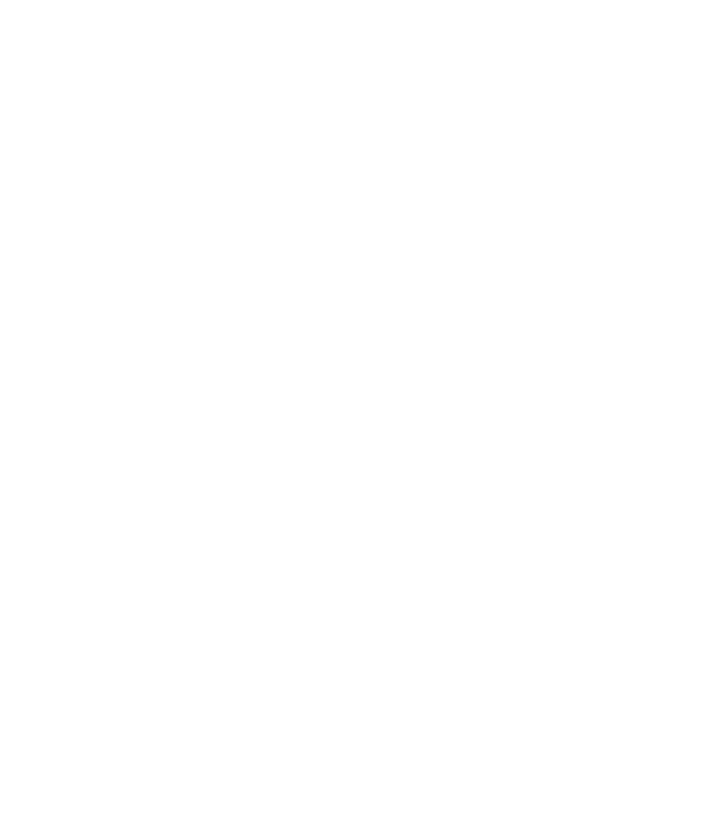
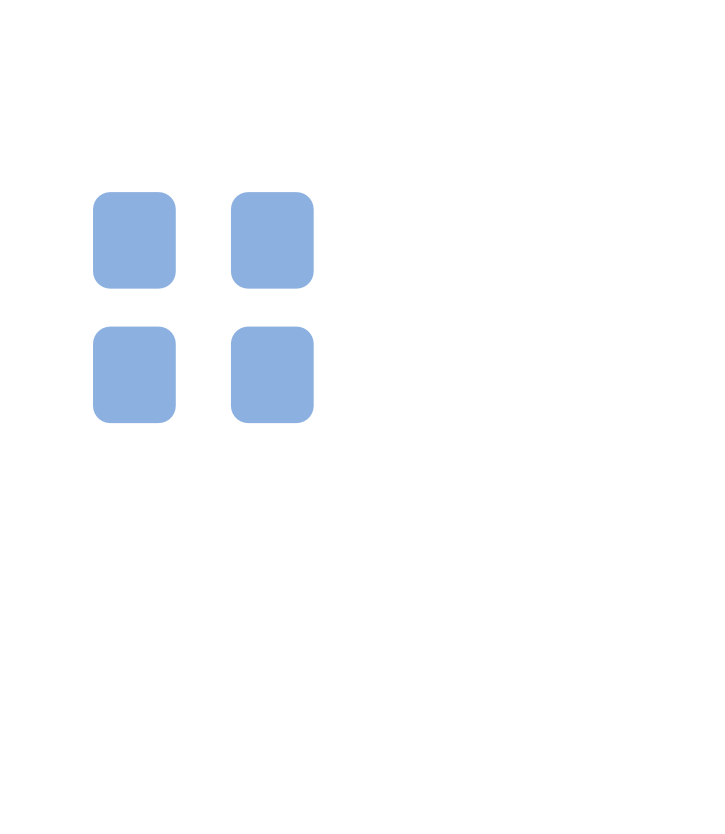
part: none -> (203, 240)
part: none -> (203, 374)

